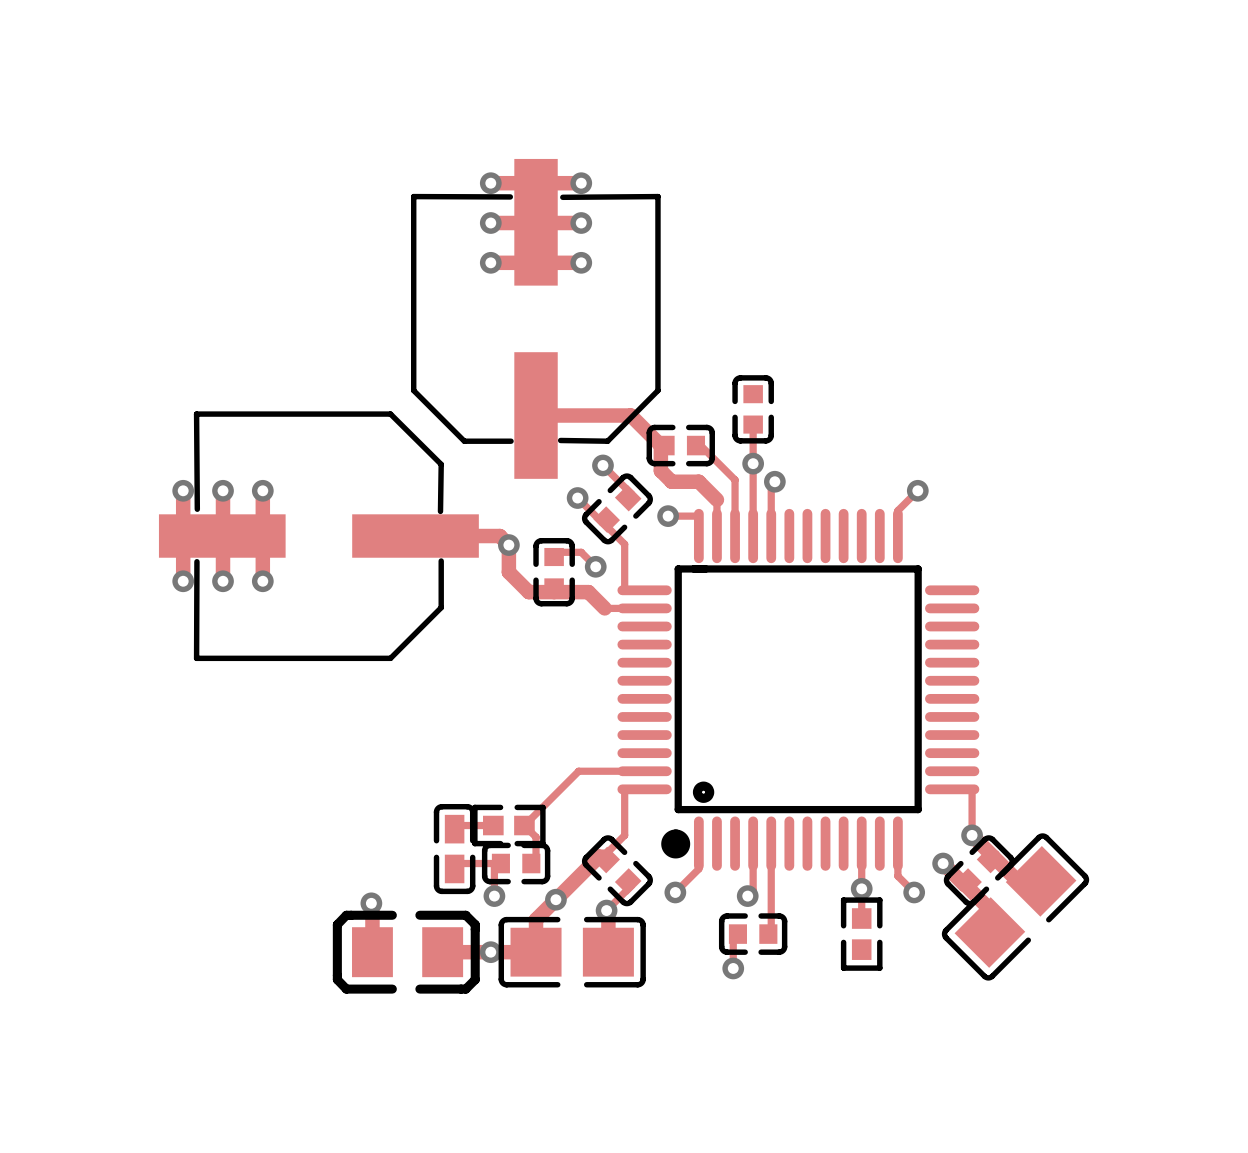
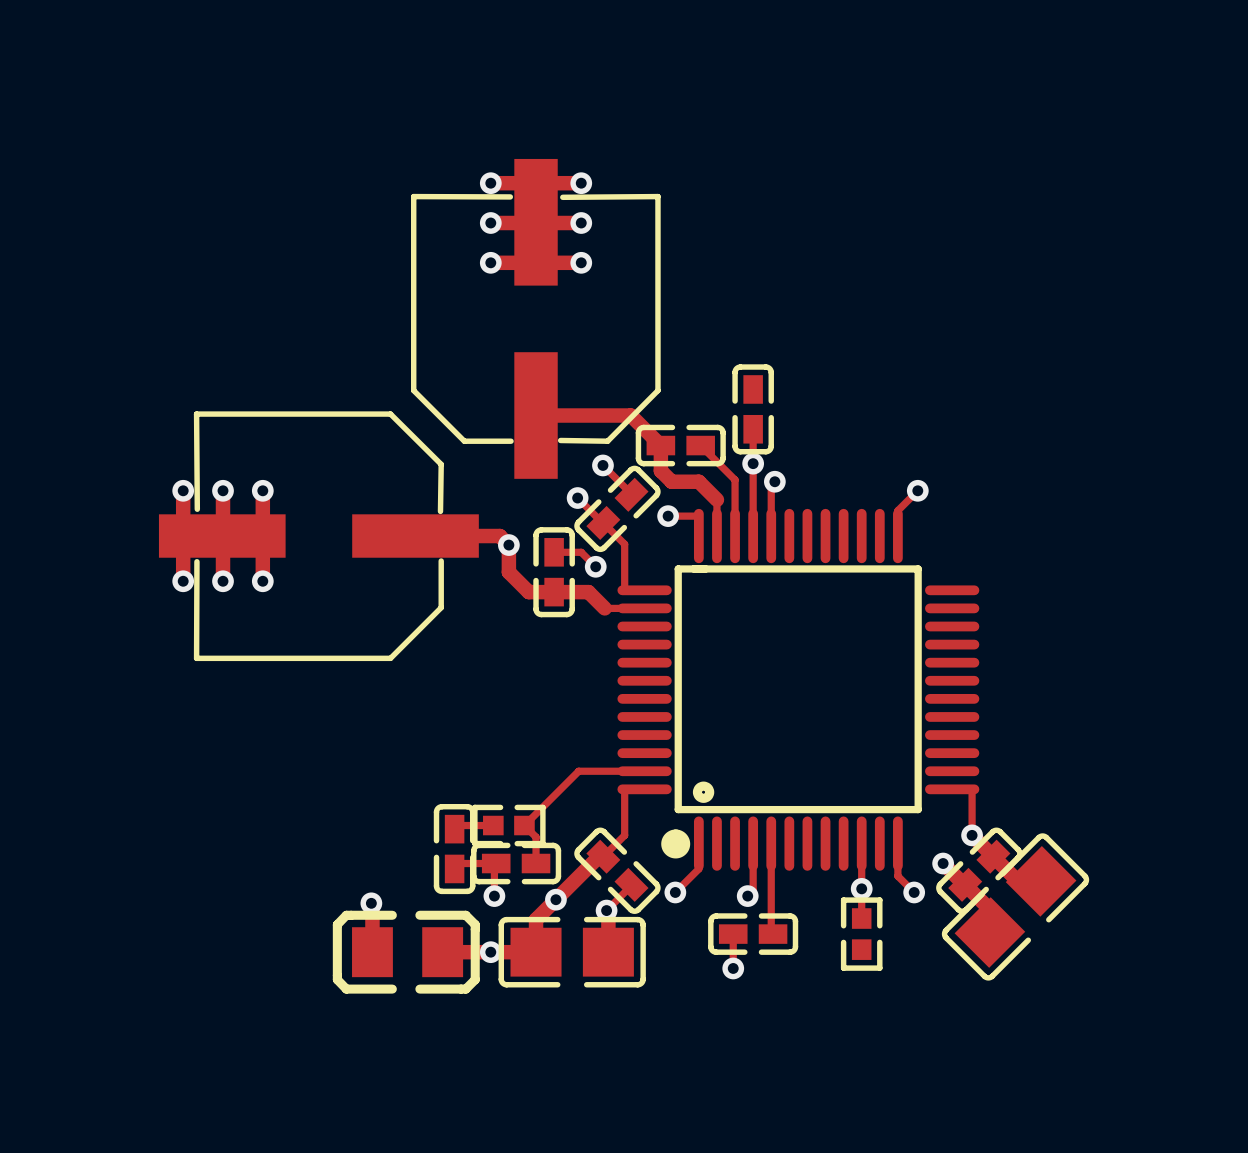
part footprint: [732, 375, 774, 444] -> [732, 364, 774, 455]
part footprint: [646, 424, 715, 467] -> [635, 424, 726, 467]
part footprint: [581, 473, 653, 545] -> [574, 465, 661, 553]
part footprint: [533, 538, 575, 607] -> [533, 527, 575, 618]
part footprint: [581, 835, 653, 907] -> [574, 827, 661, 914]
part footprint: [943, 835, 1015, 907] -> [936, 827, 1023, 914]
part footprint: [481, 842, 551, 885] -> [471, 842, 562, 885]
part footprint: [718, 913, 788, 955] -> [708, 913, 799, 955]

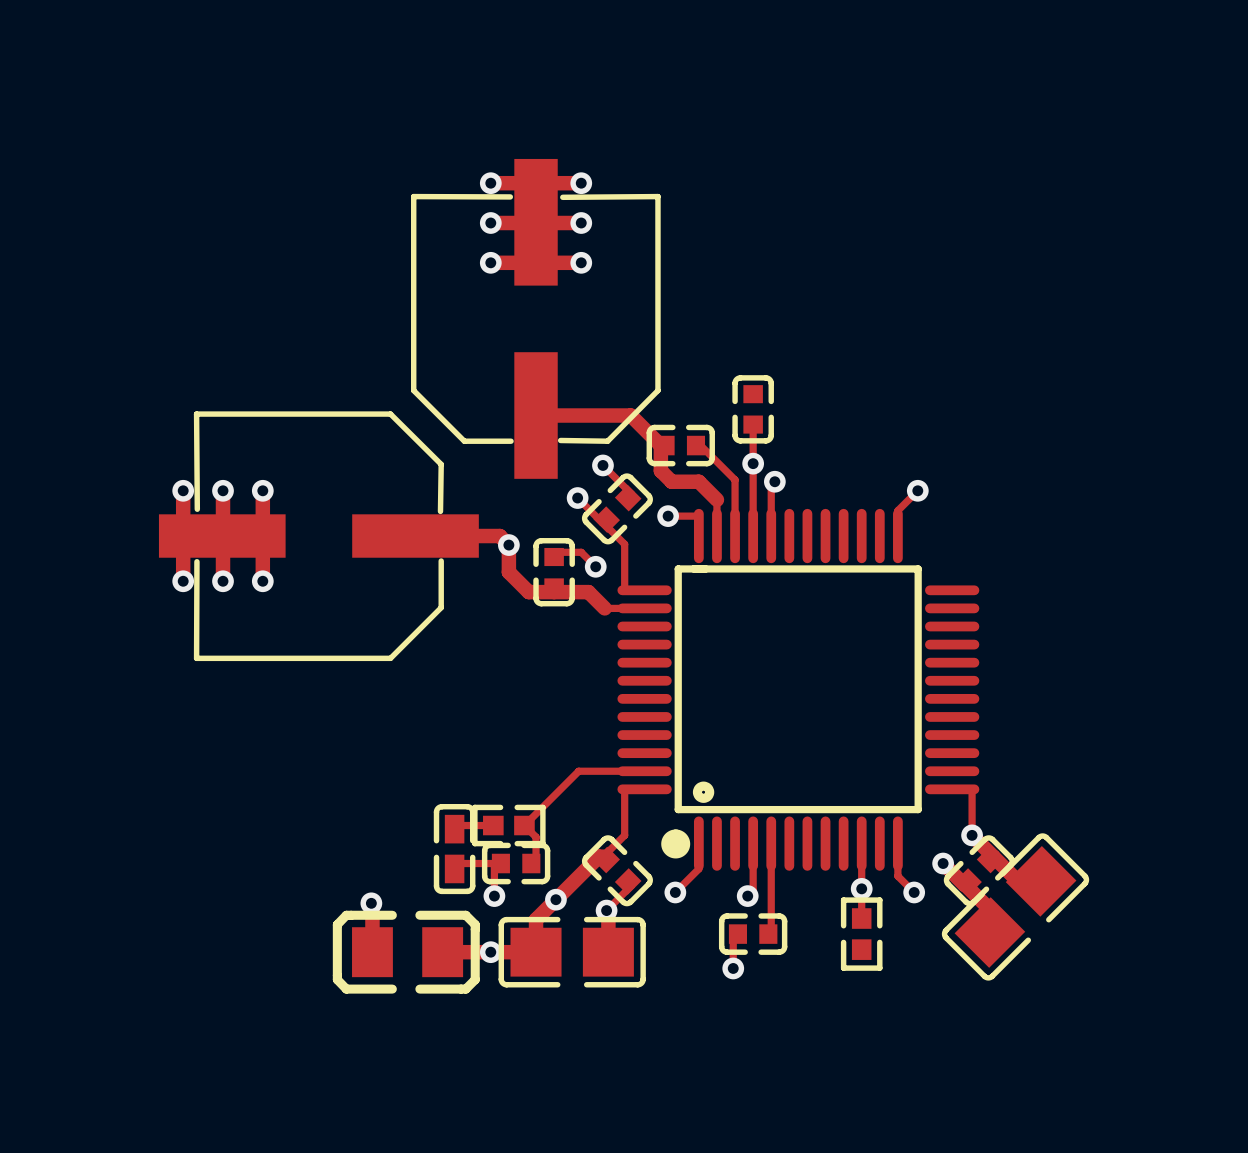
part footprint: [732, 364, 774, 455] -> [732, 375, 774, 444]
part footprint: [635, 424, 726, 467] -> [646, 424, 715, 467]
part footprint: [574, 465, 661, 553] -> [581, 473, 653, 545]
part footprint: [533, 527, 575, 618] -> [533, 538, 575, 607]
part footprint: [574, 827, 661, 914] -> [581, 835, 653, 907]
part footprint: [936, 827, 1023, 914] -> [943, 835, 1015, 907]
part footprint: [471, 842, 562, 885] -> [481, 842, 551, 885]
part footprint: [708, 913, 799, 955] -> [718, 913, 788, 955]

